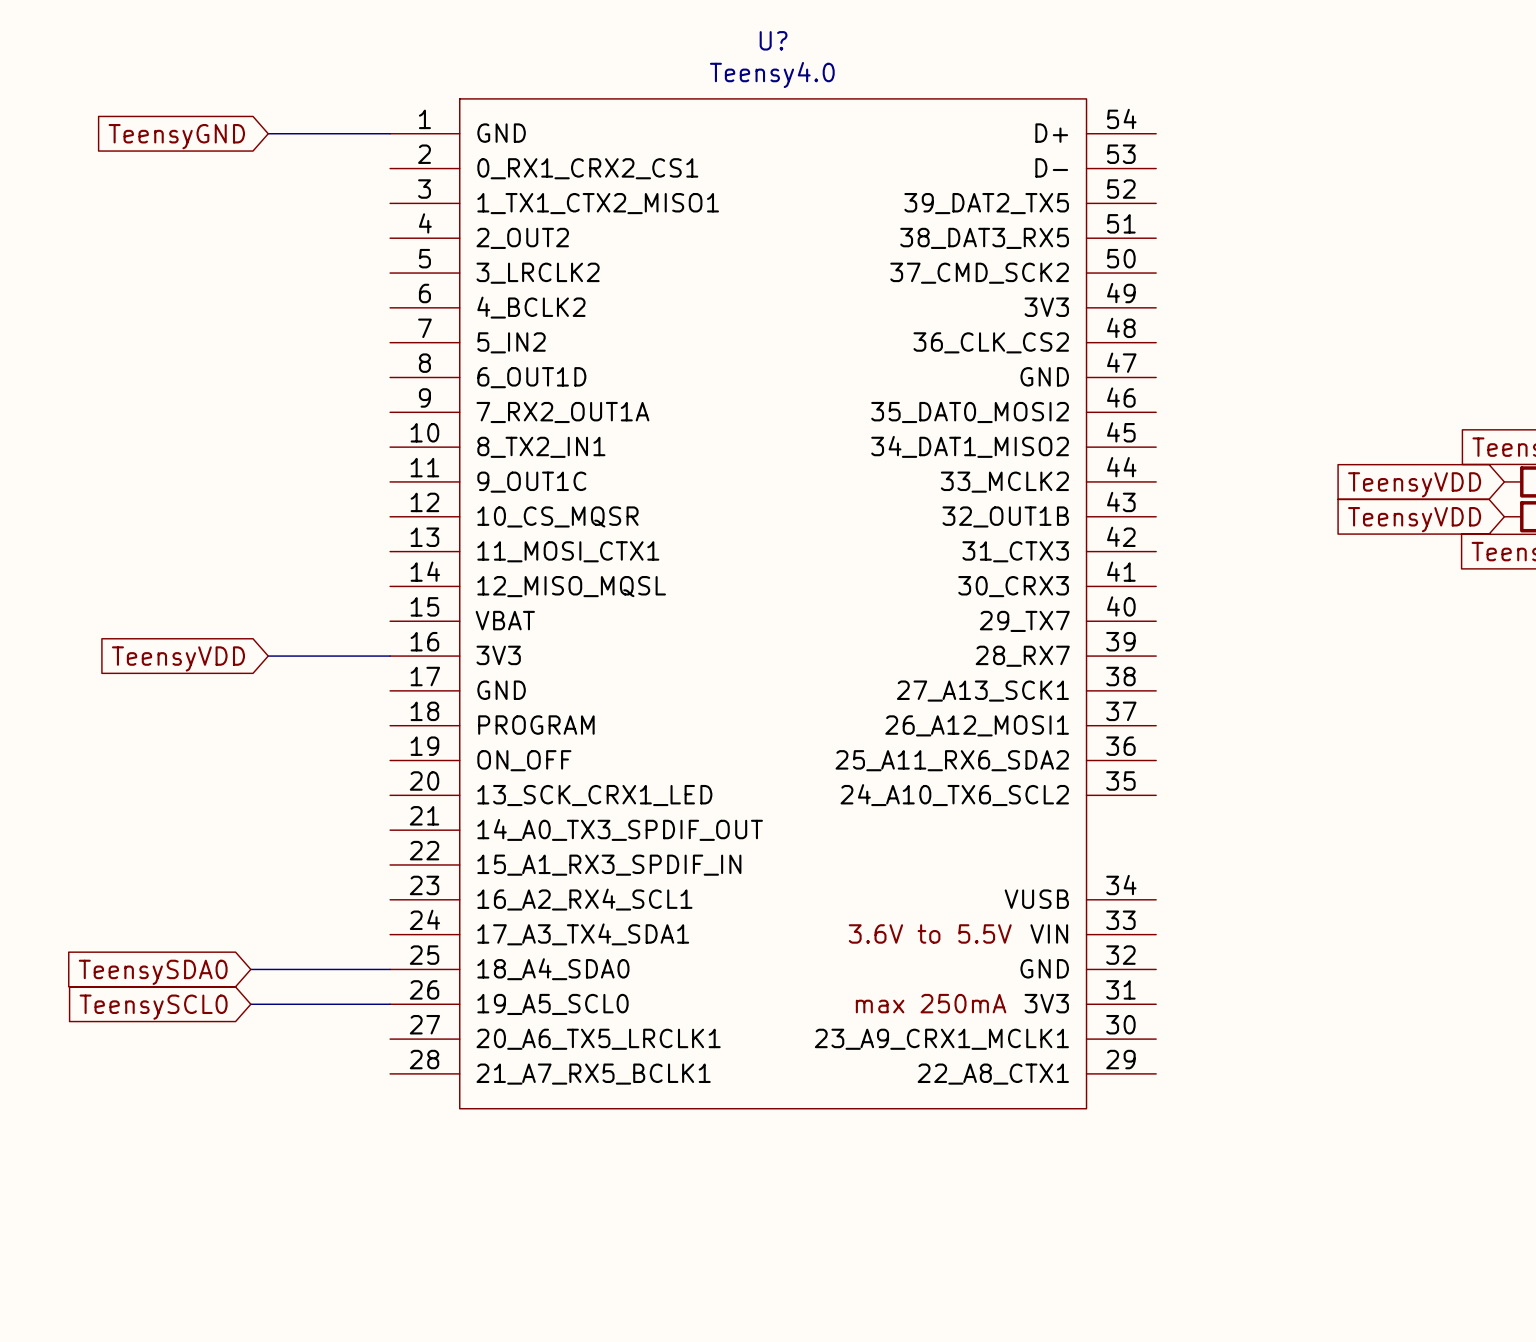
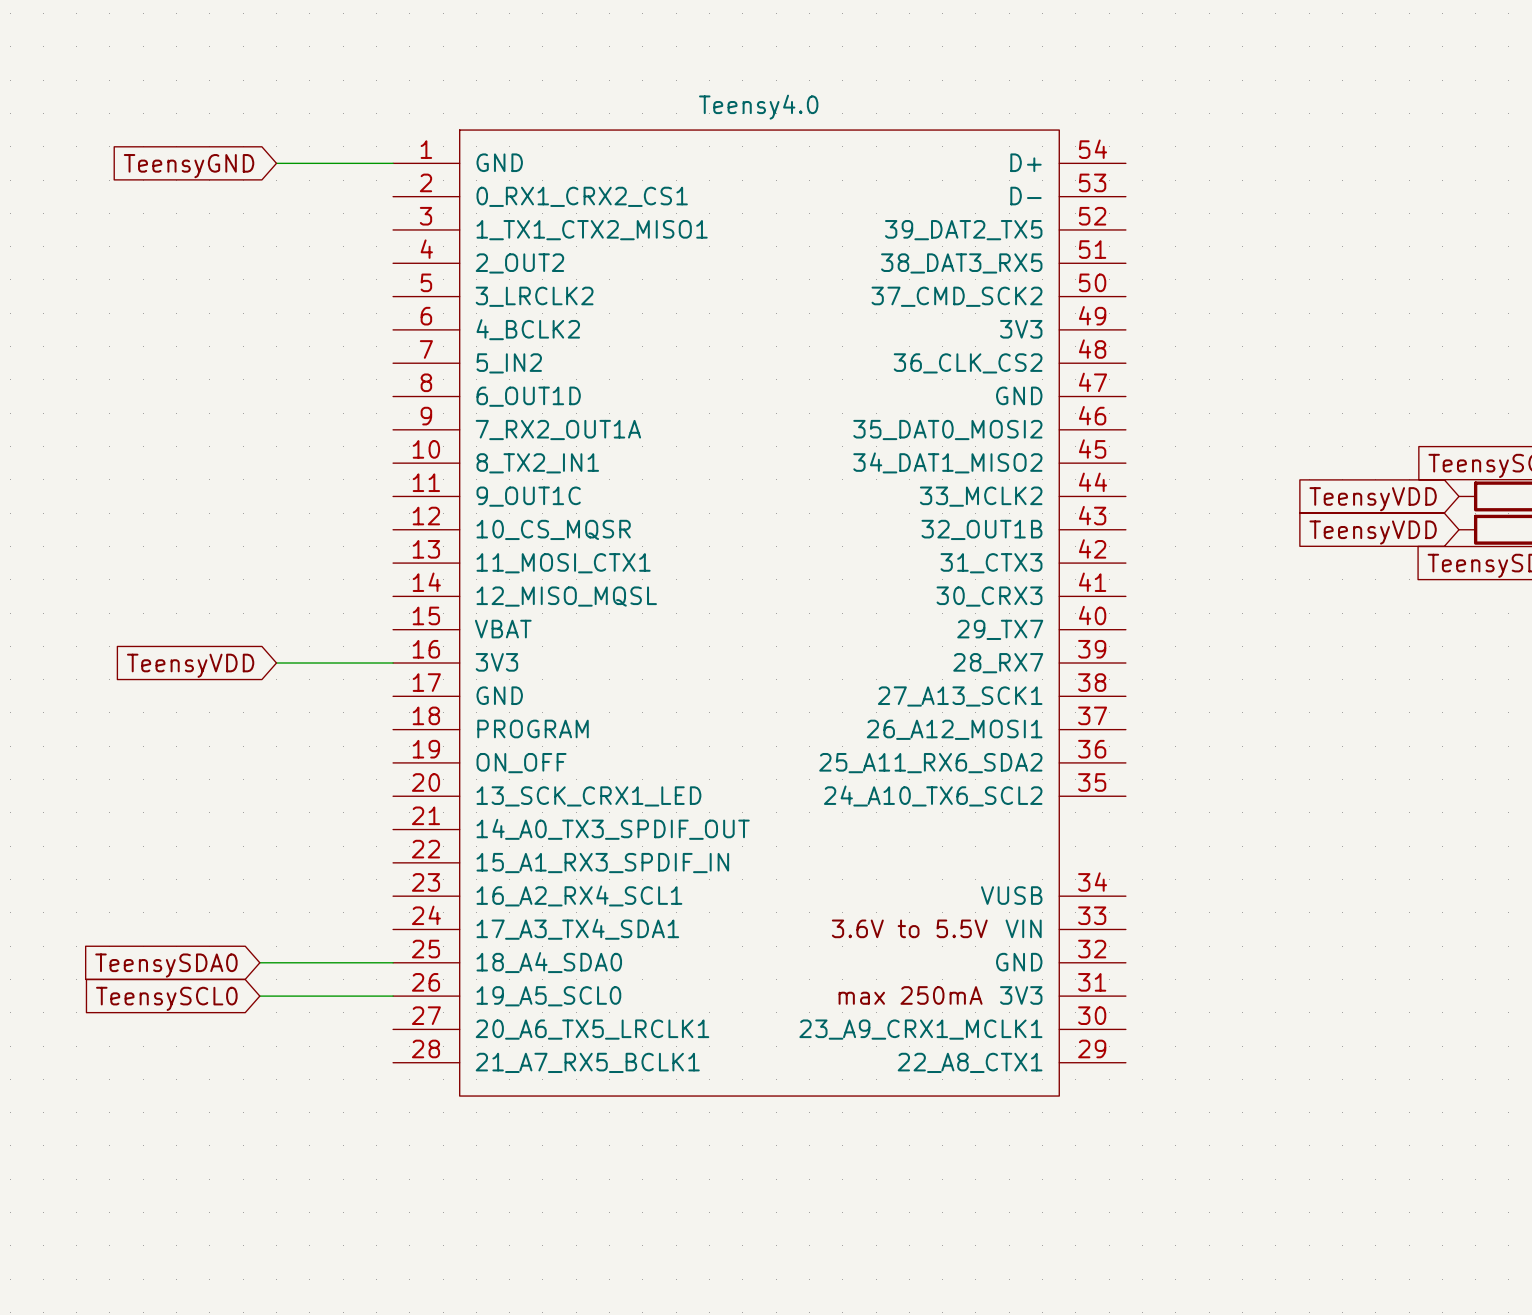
U? name: U? (773, 40) -> none

